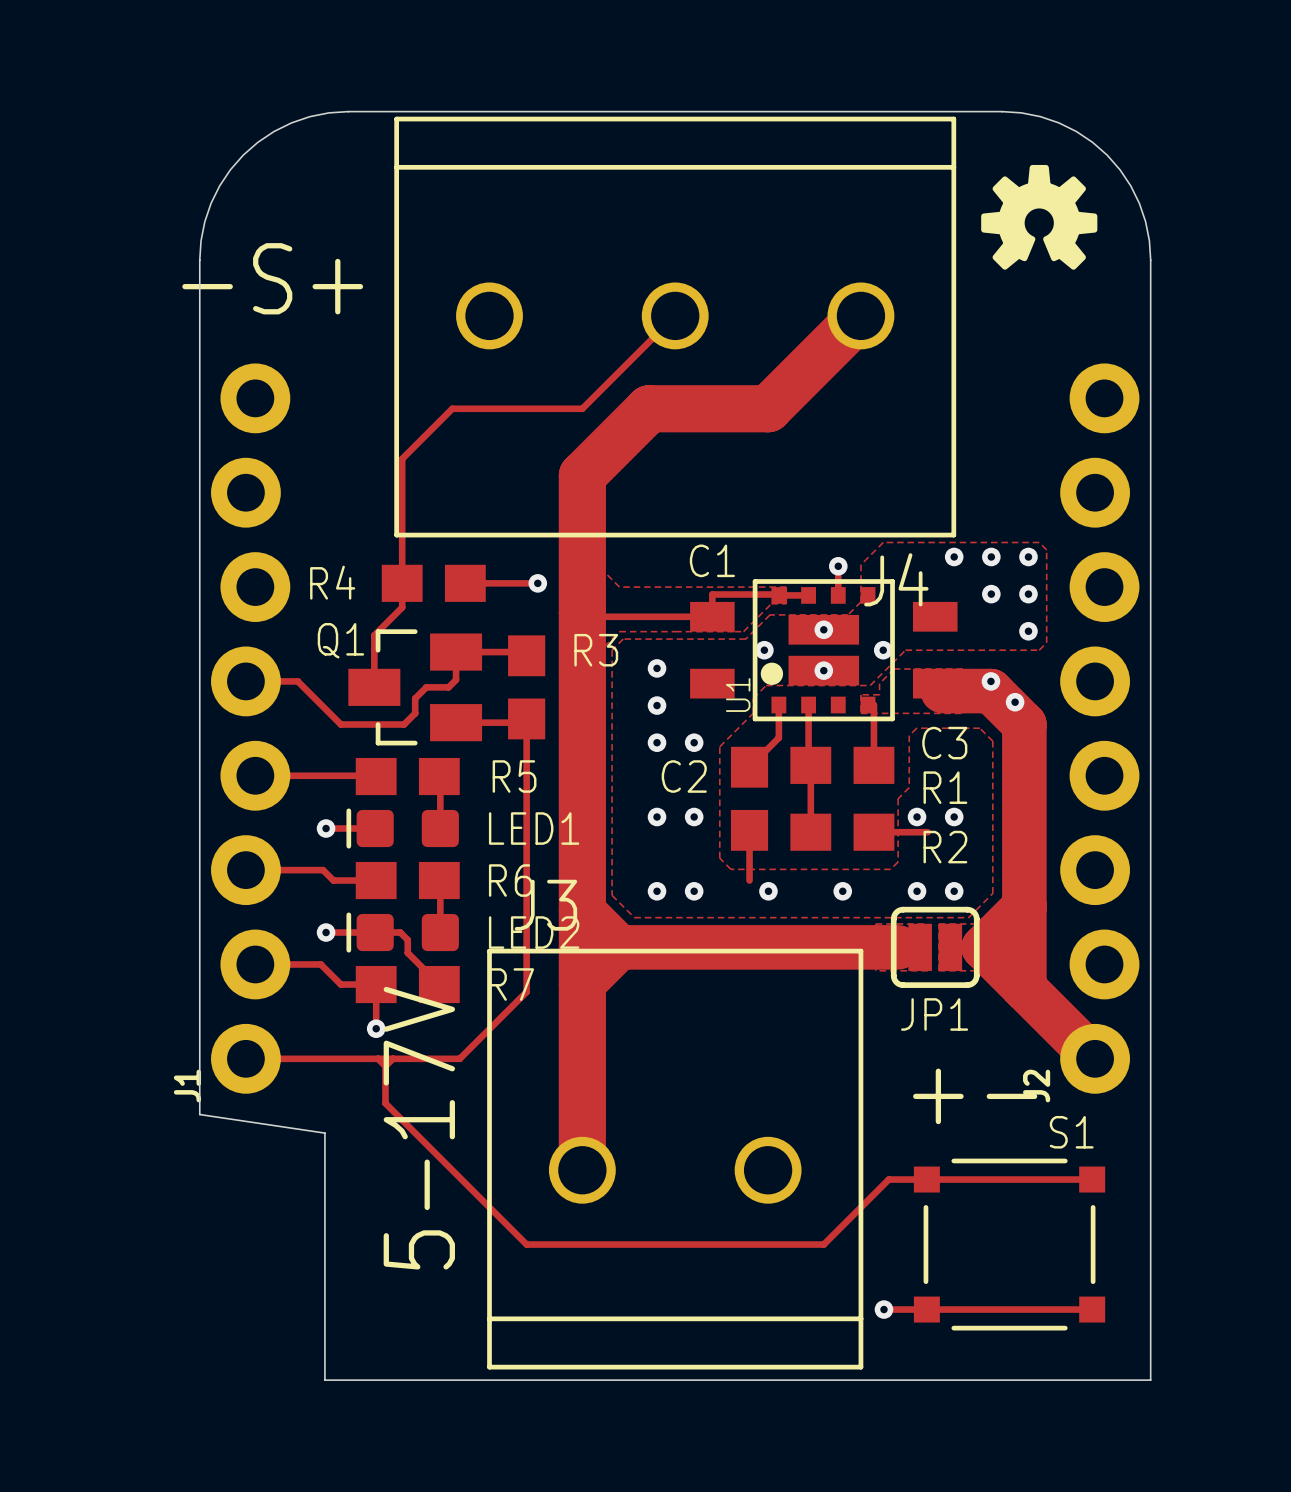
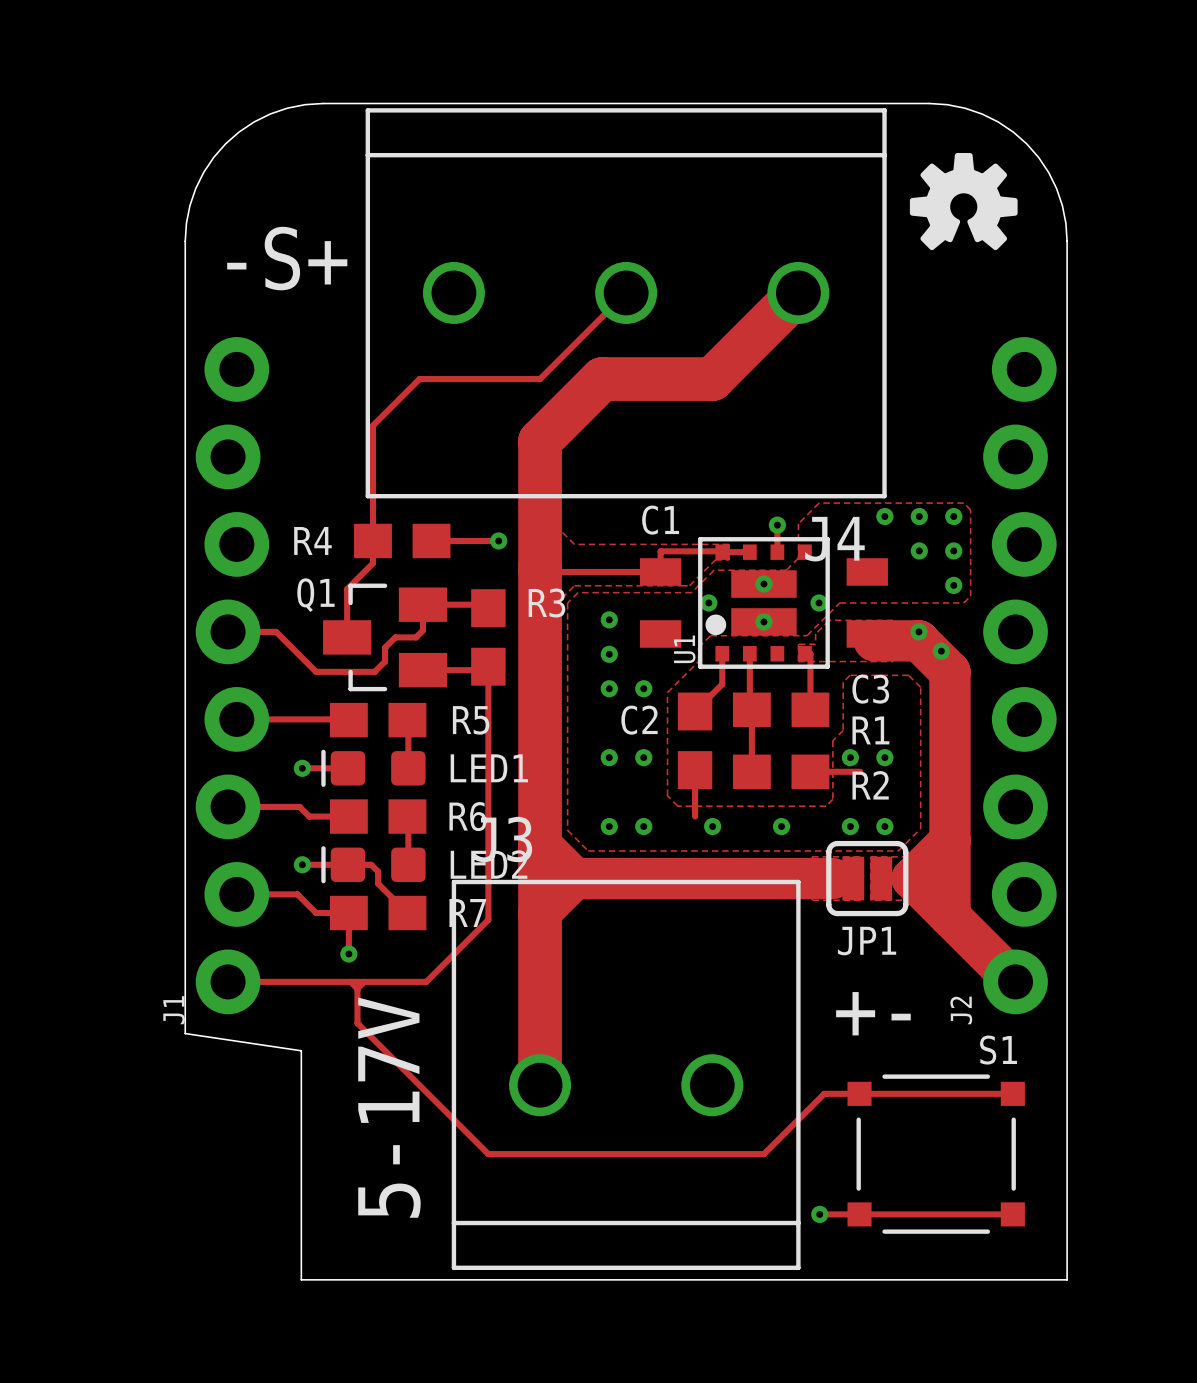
text position: 5-17V (419, 1128) -> 5-17V (389, 1107)

